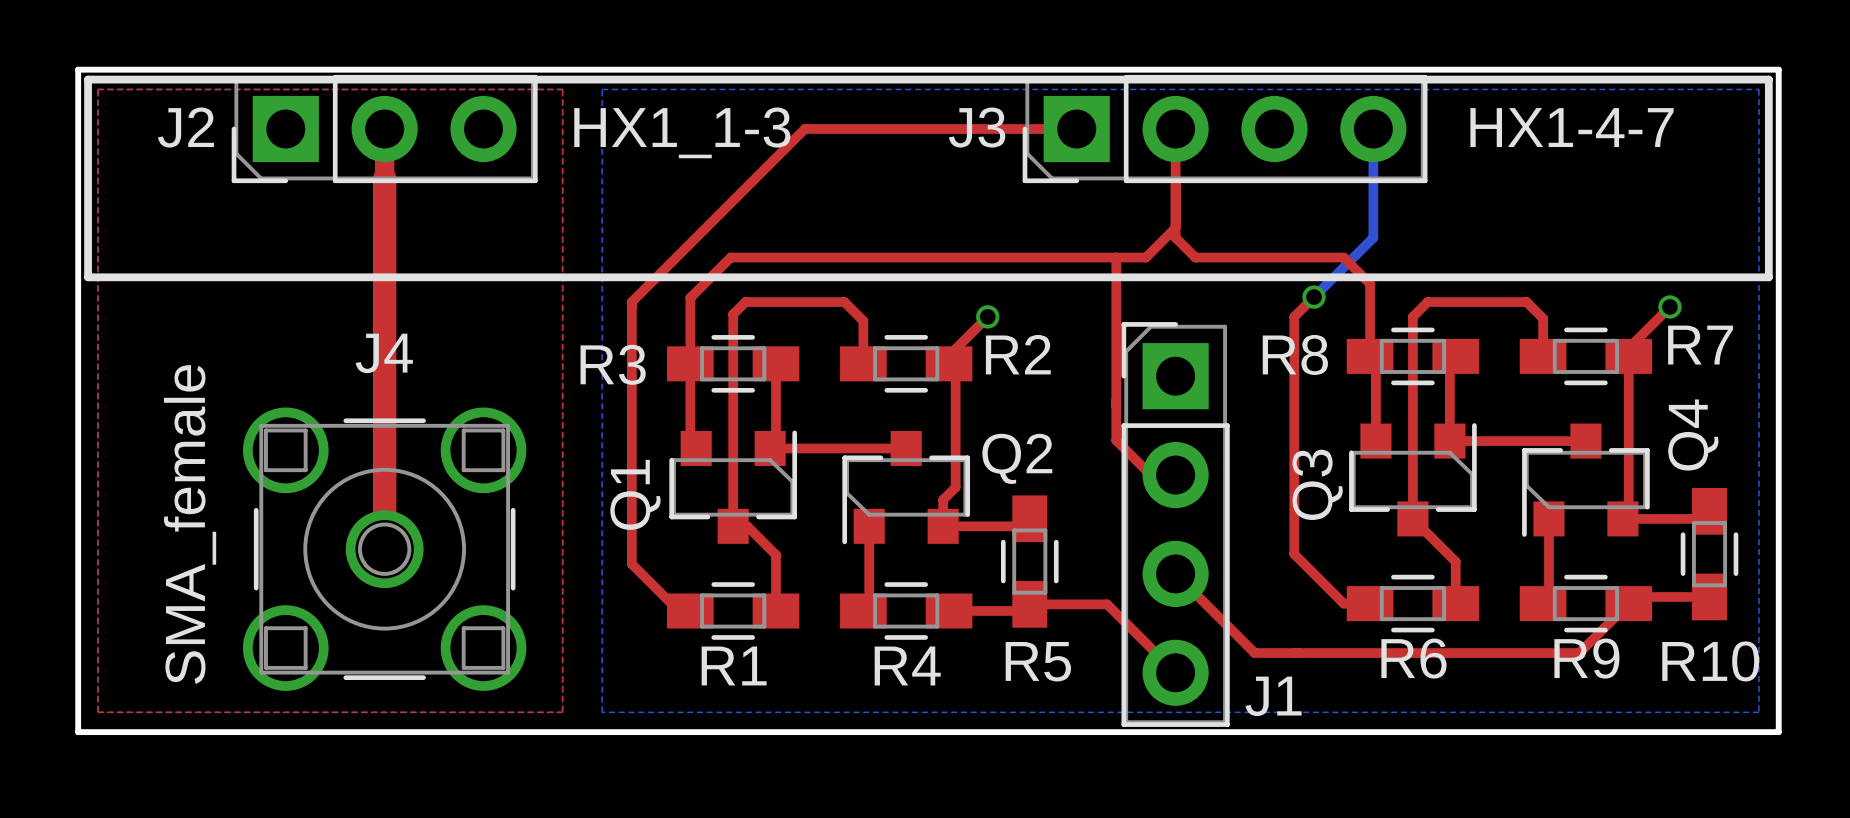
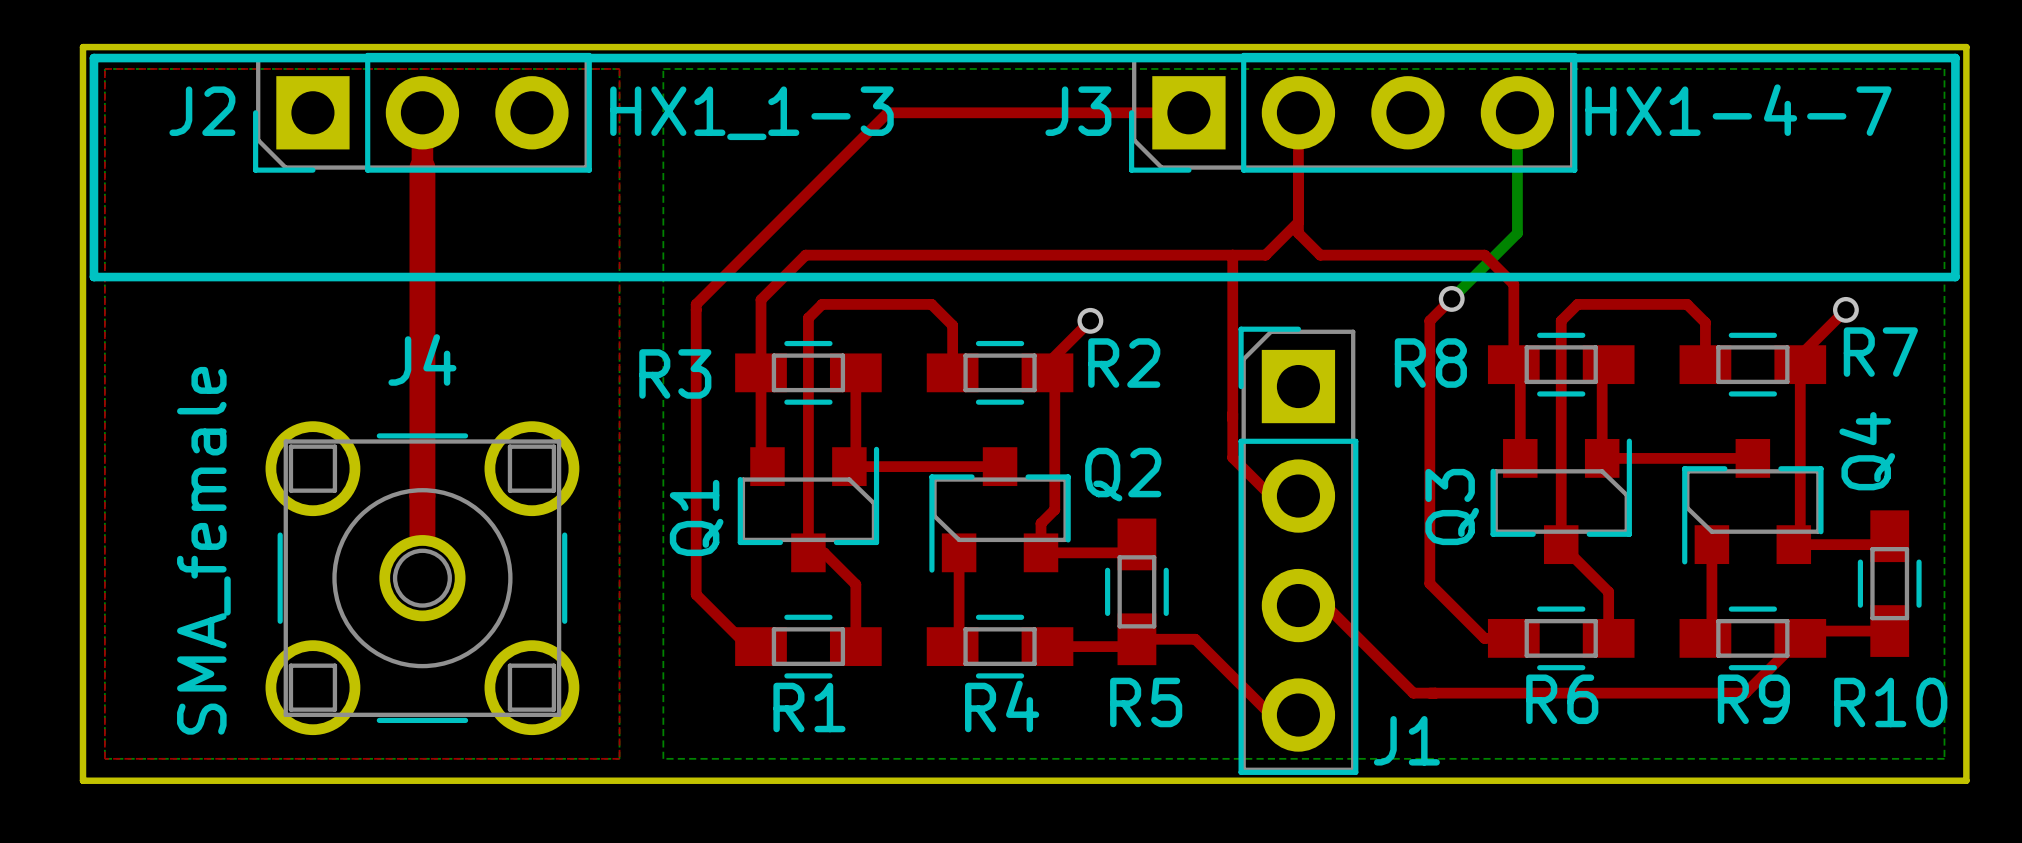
top track: (1175, 573) (1254, 653) (1279, 653) -> (1298, 578) (1413, 693)
top track: (1082, 604) (1107, 604) (1175, 672) -> (1195, 639) (1298, 742)

